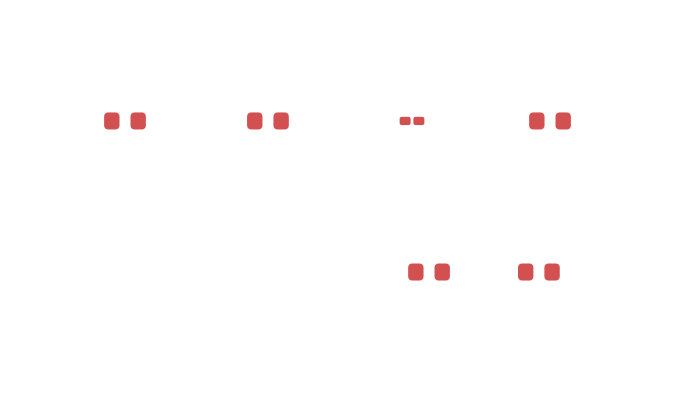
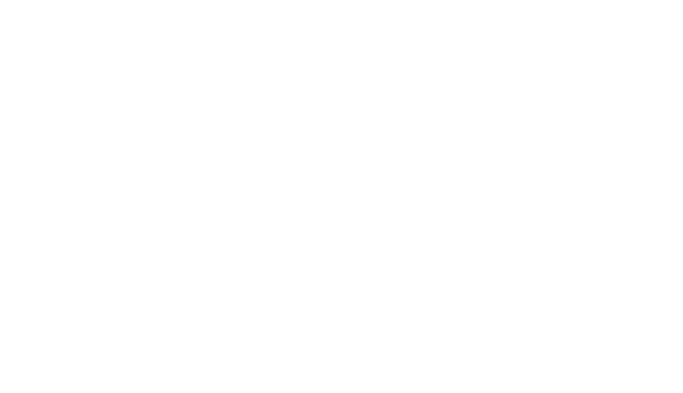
part: (124, 120) -> none
part: (267, 120) -> none
part: (412, 120) -> none
part: (550, 120) -> none
part: (429, 272) -> none
part: (538, 272) -> none

